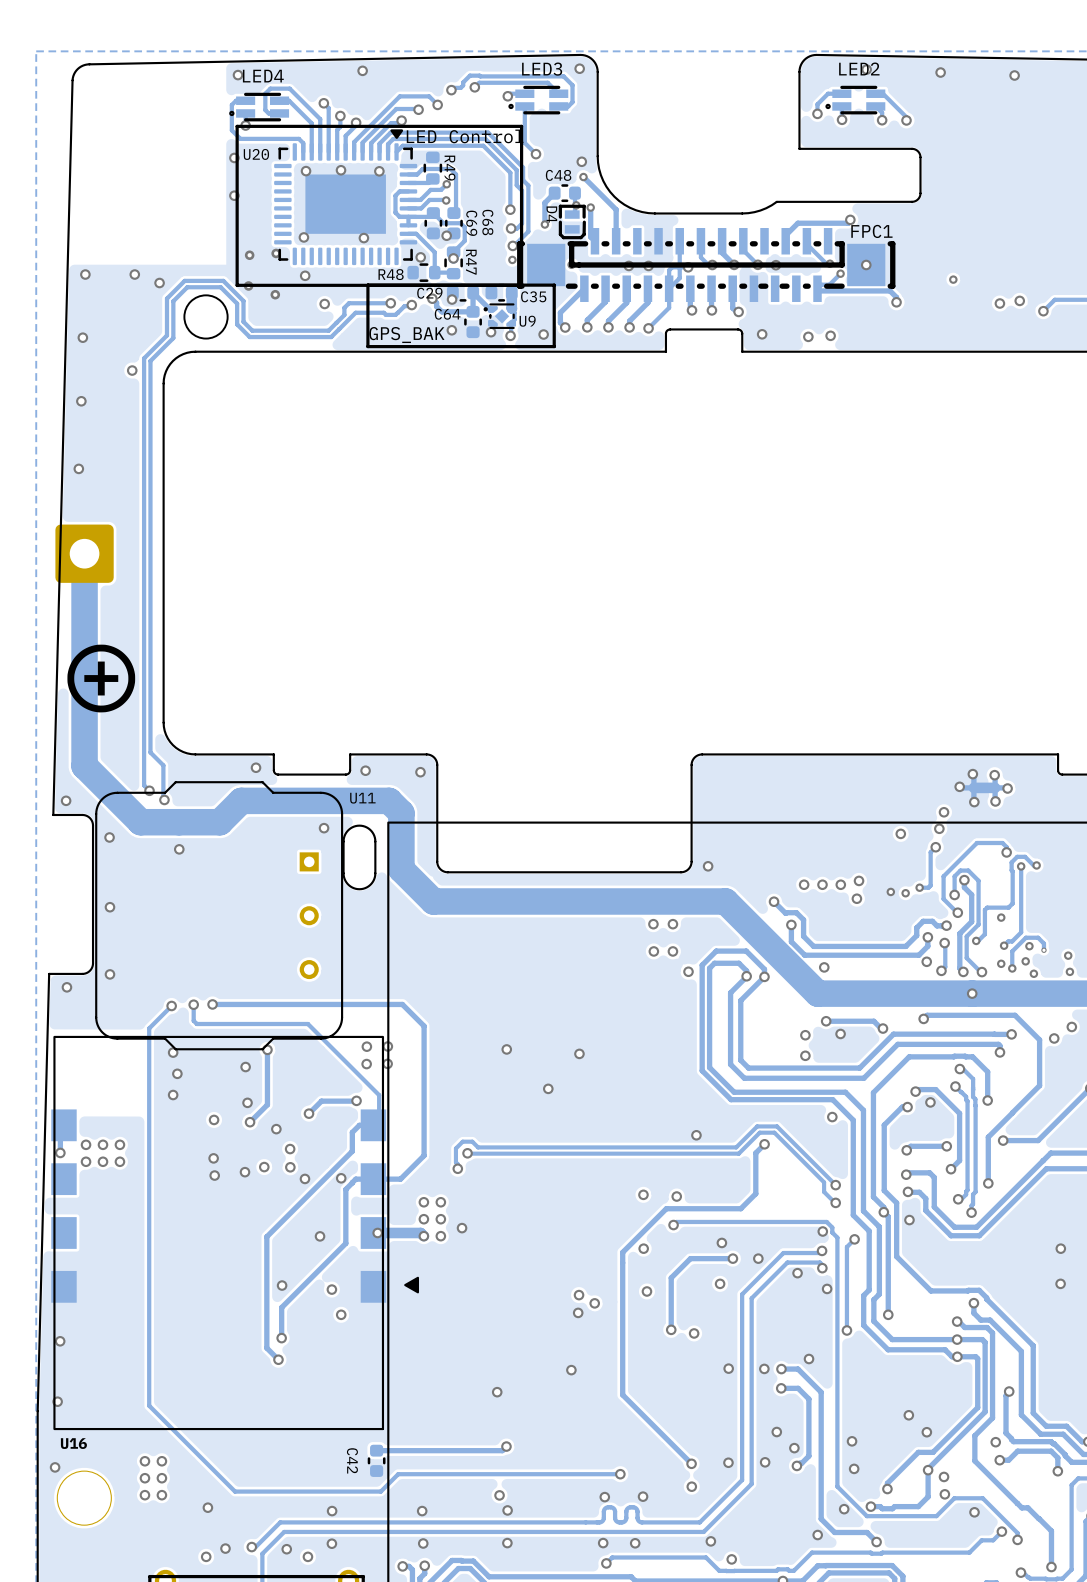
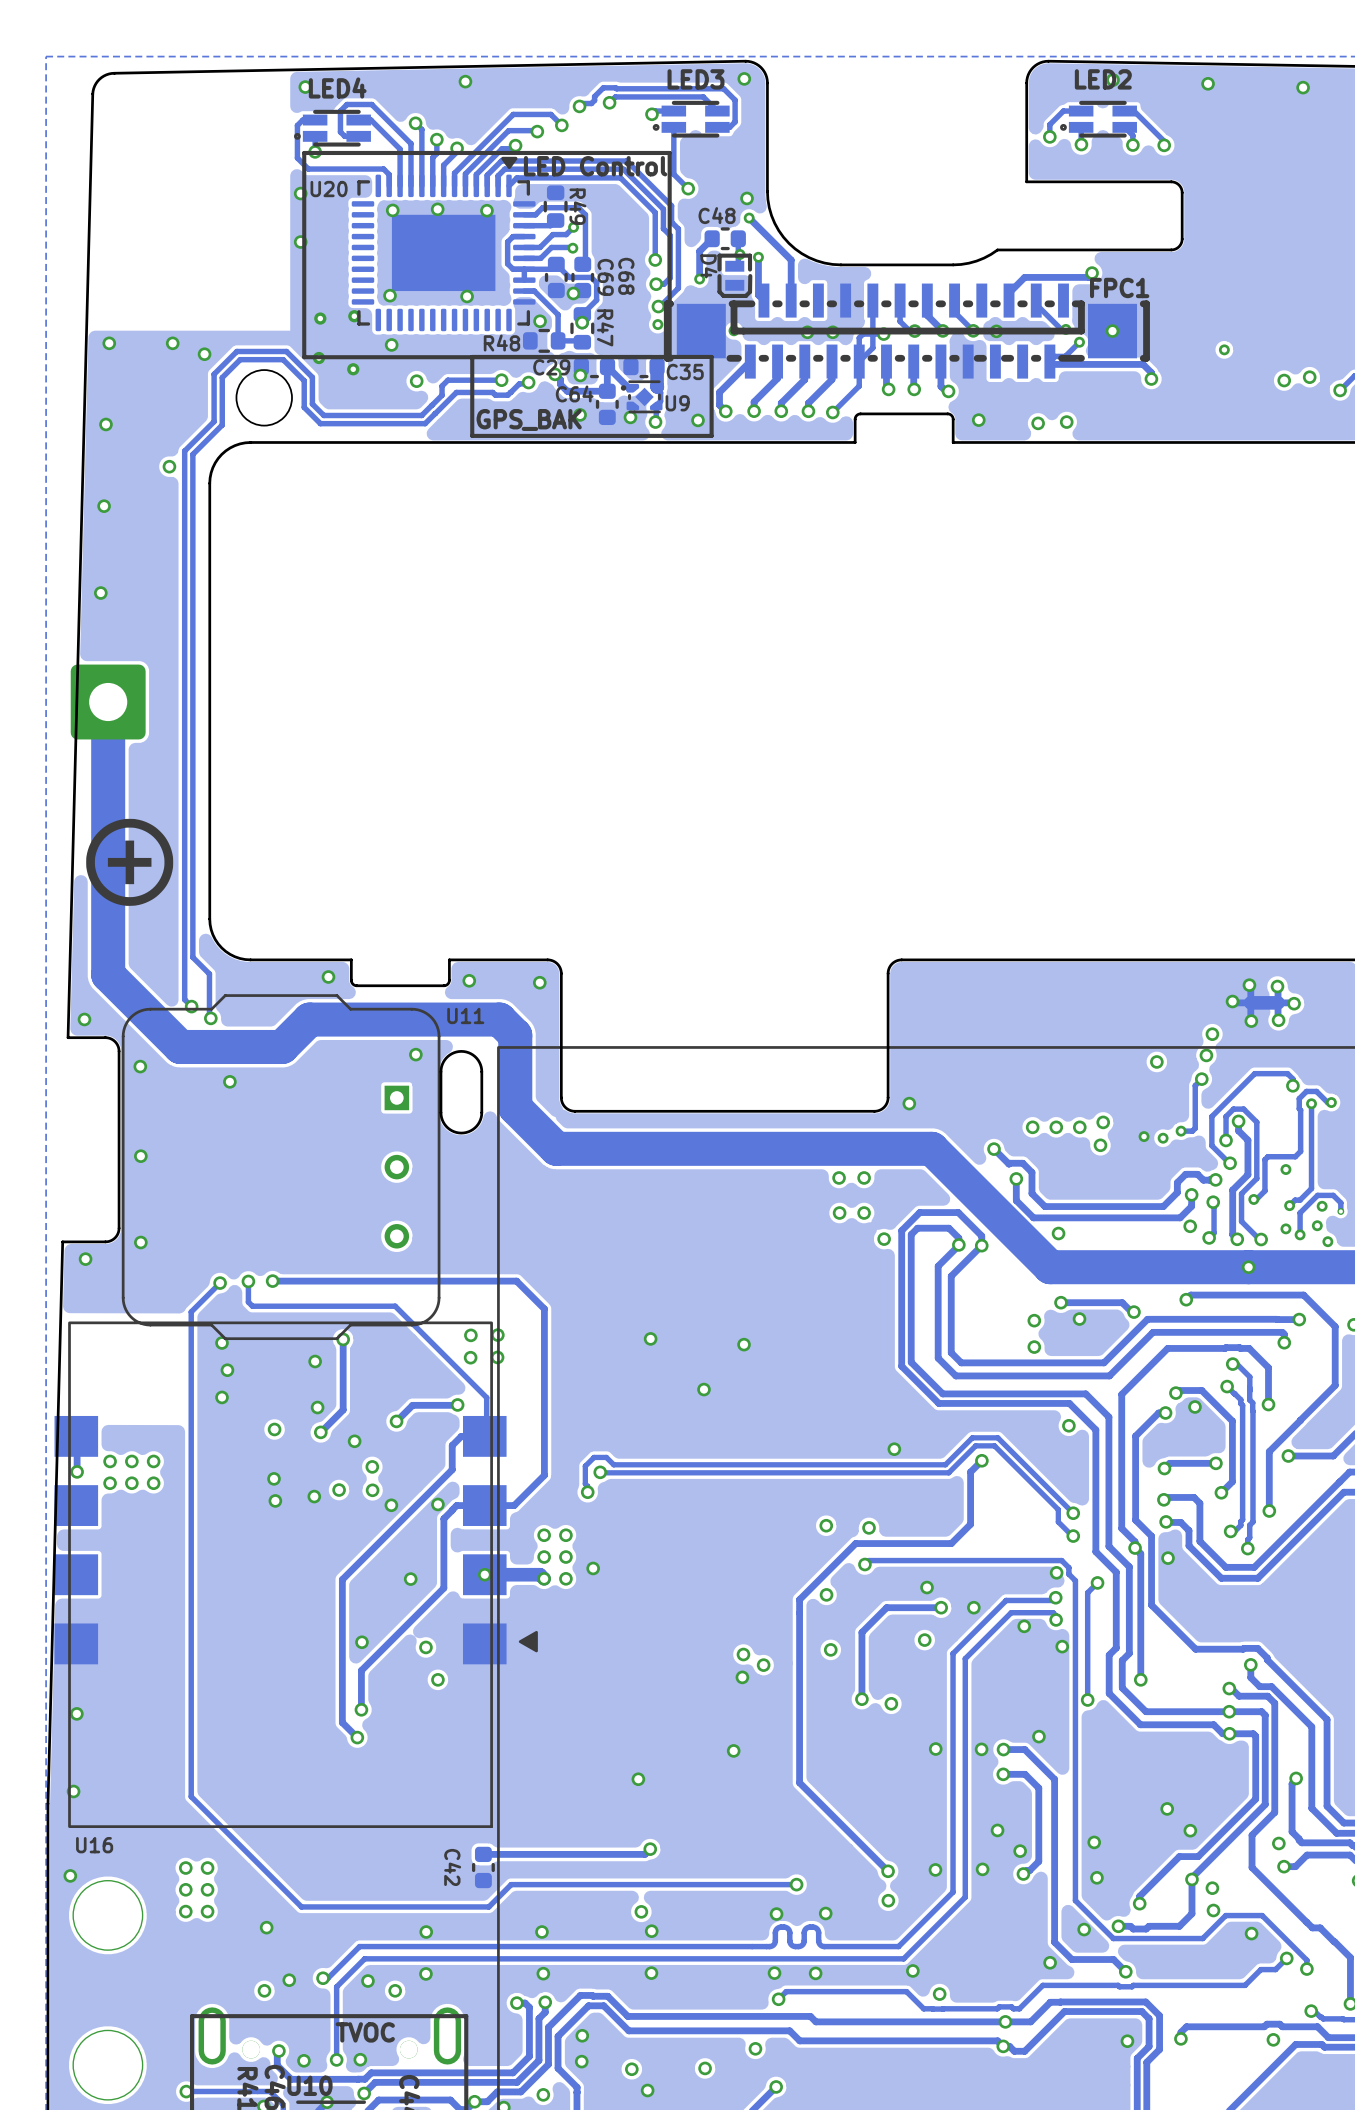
U16 footprint: [51, 1035, 420, 1431] -> [54, 1321, 538, 1828]

